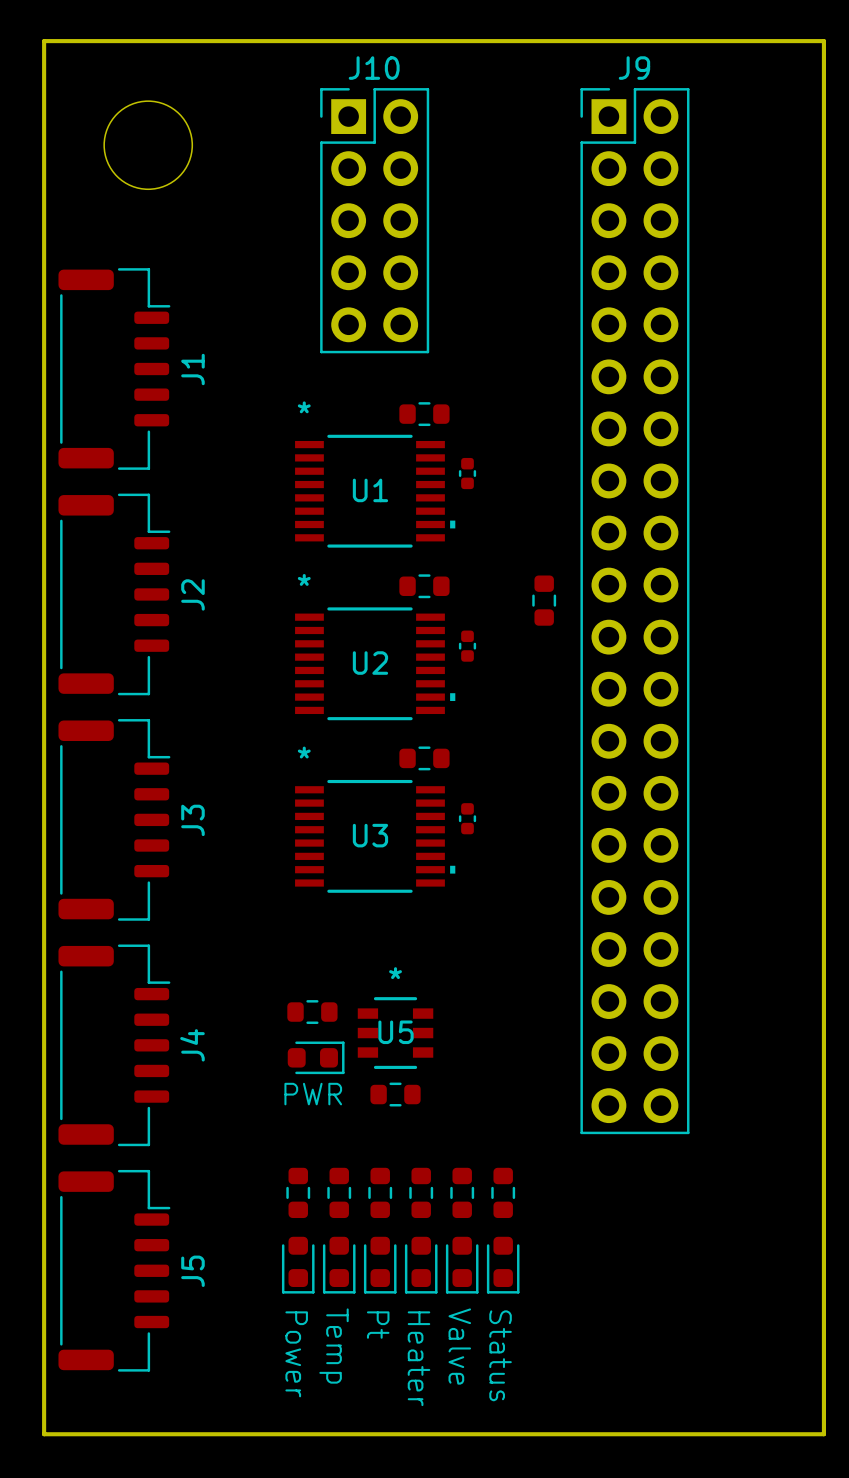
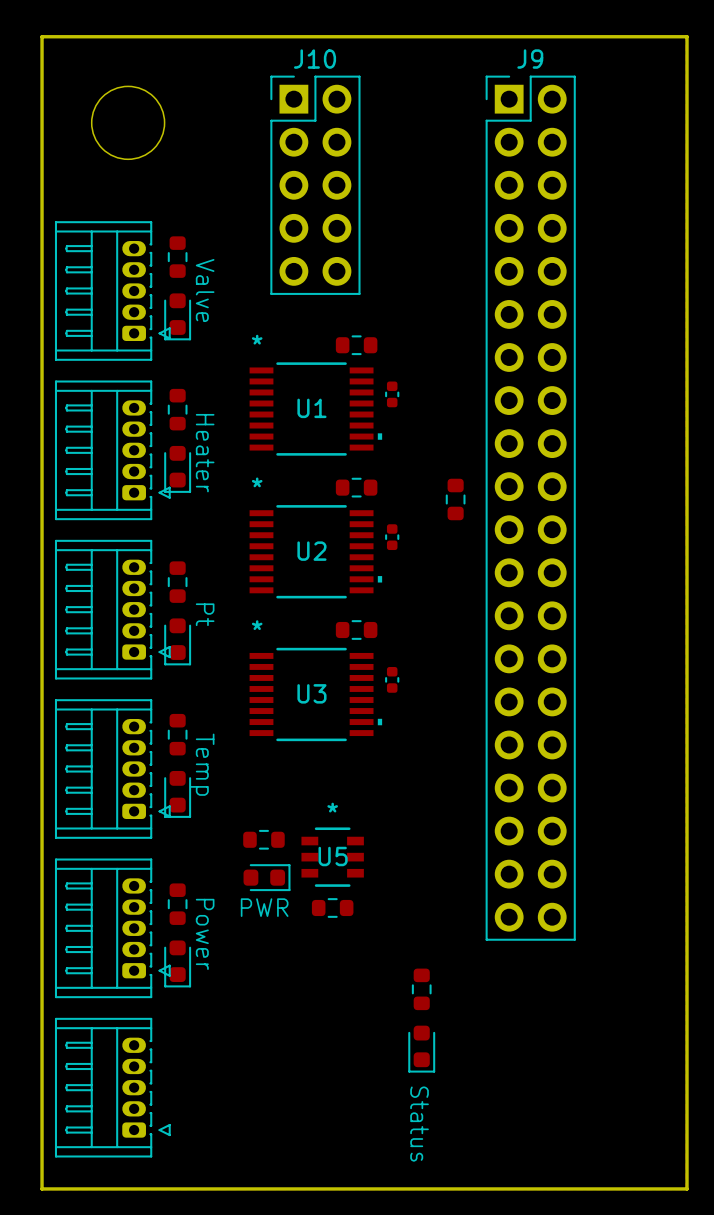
part: none -> (177, 257)
text: none -> Valve (205, 290)
part: none -> (112, 290)
J1: (114, 369) -> none
part: none -> (177, 316)
part: none -> (177, 409)
part: none -> (112, 450)
text: none -> Heater (205, 453)
part: none -> (177, 469)
J2: (114, 594) -> none
part: none -> (177, 582)
part: none -> (112, 609)
text: none -> Pt (205, 614)
part: none -> (177, 641)
J3: (114, 819) -> none
part: none -> (177, 734)
part: none -> (112, 769)
part: none -> (177, 794)
J4: (114, 1045) -> none
part: none -> (177, 904)
part: none -> (112, 928)
part: none -> (177, 963)
part: (298, 1192) -> none
part: (339, 1192) -> none
part: (380, 1192) -> none
part: (421, 1192) -> none
part: (462, 1192) -> none
part: (298, 1265) -> none
part: (339, 1265) -> none
part: (380, 1265) -> none
part: (421, 1265) -> none
part: (462, 1265) -> none
J5: (114, 1270) -> none
part: none -> (112, 1087)
text: Pt (378, 1325) -> none
text position: Temp (334, 1346) -> Temp (202, 764)
text: Valve (459, 1346) -> none
text position: Power (296, 1354) -> Power (205, 934)
text: Heater (418, 1358) -> none

